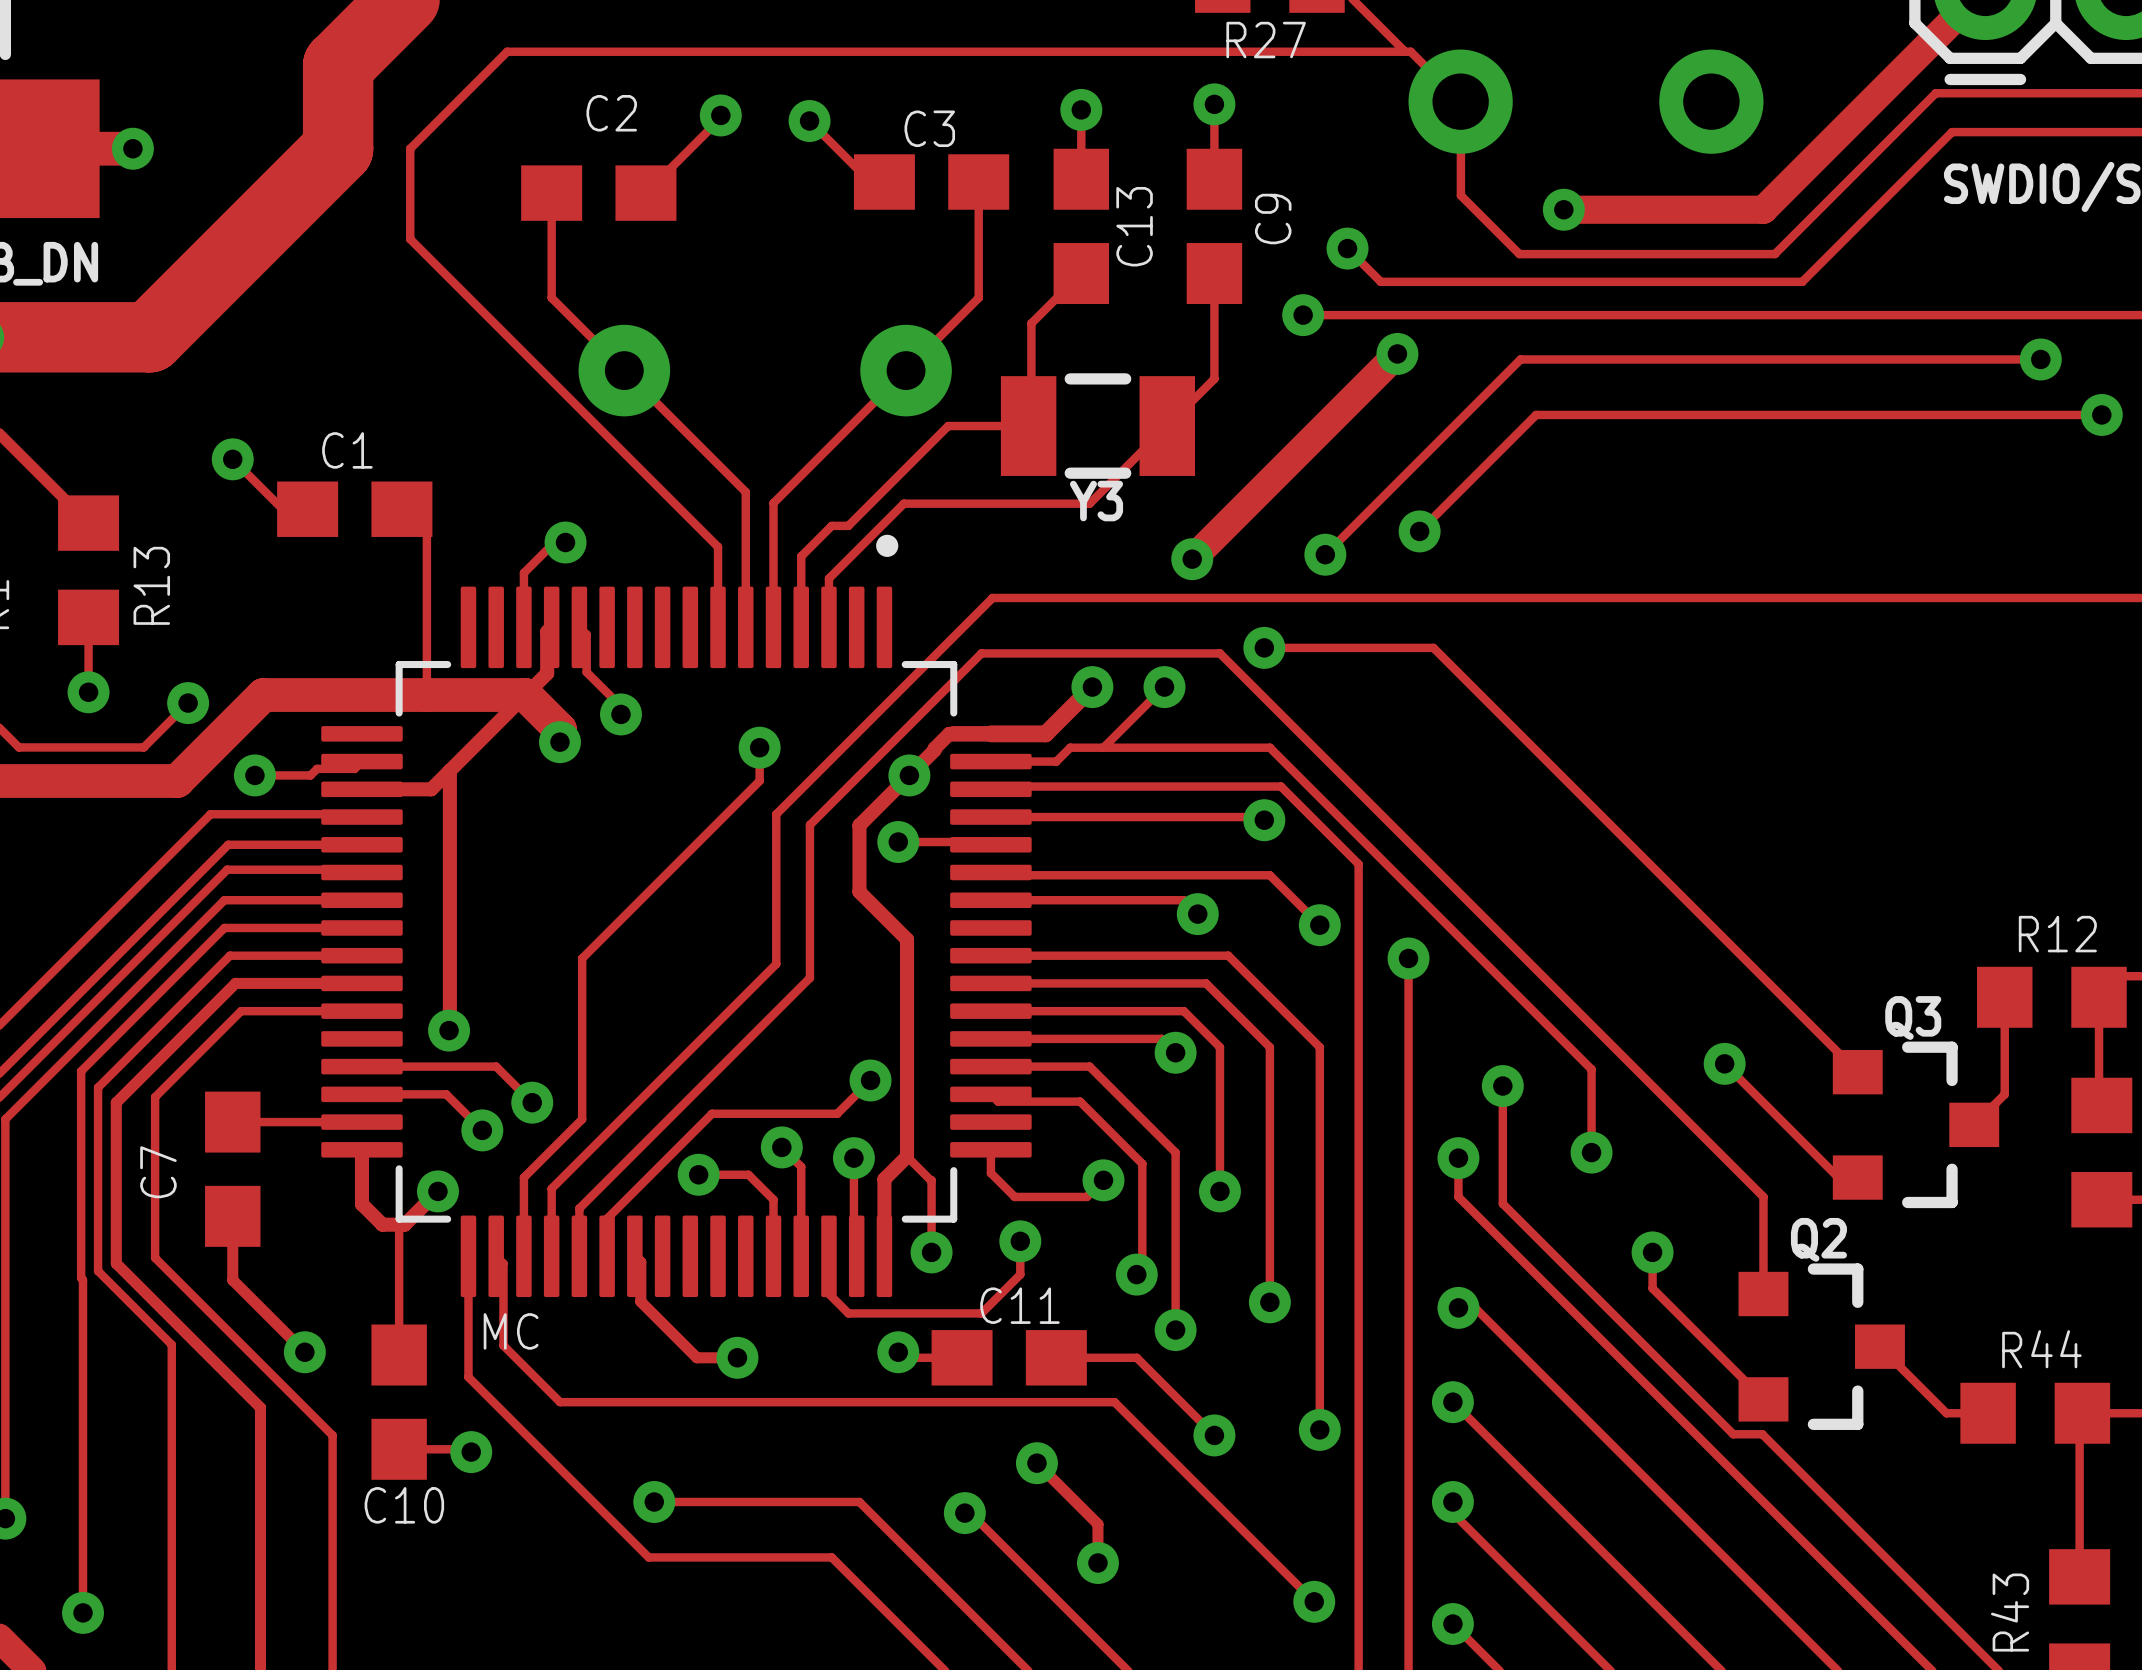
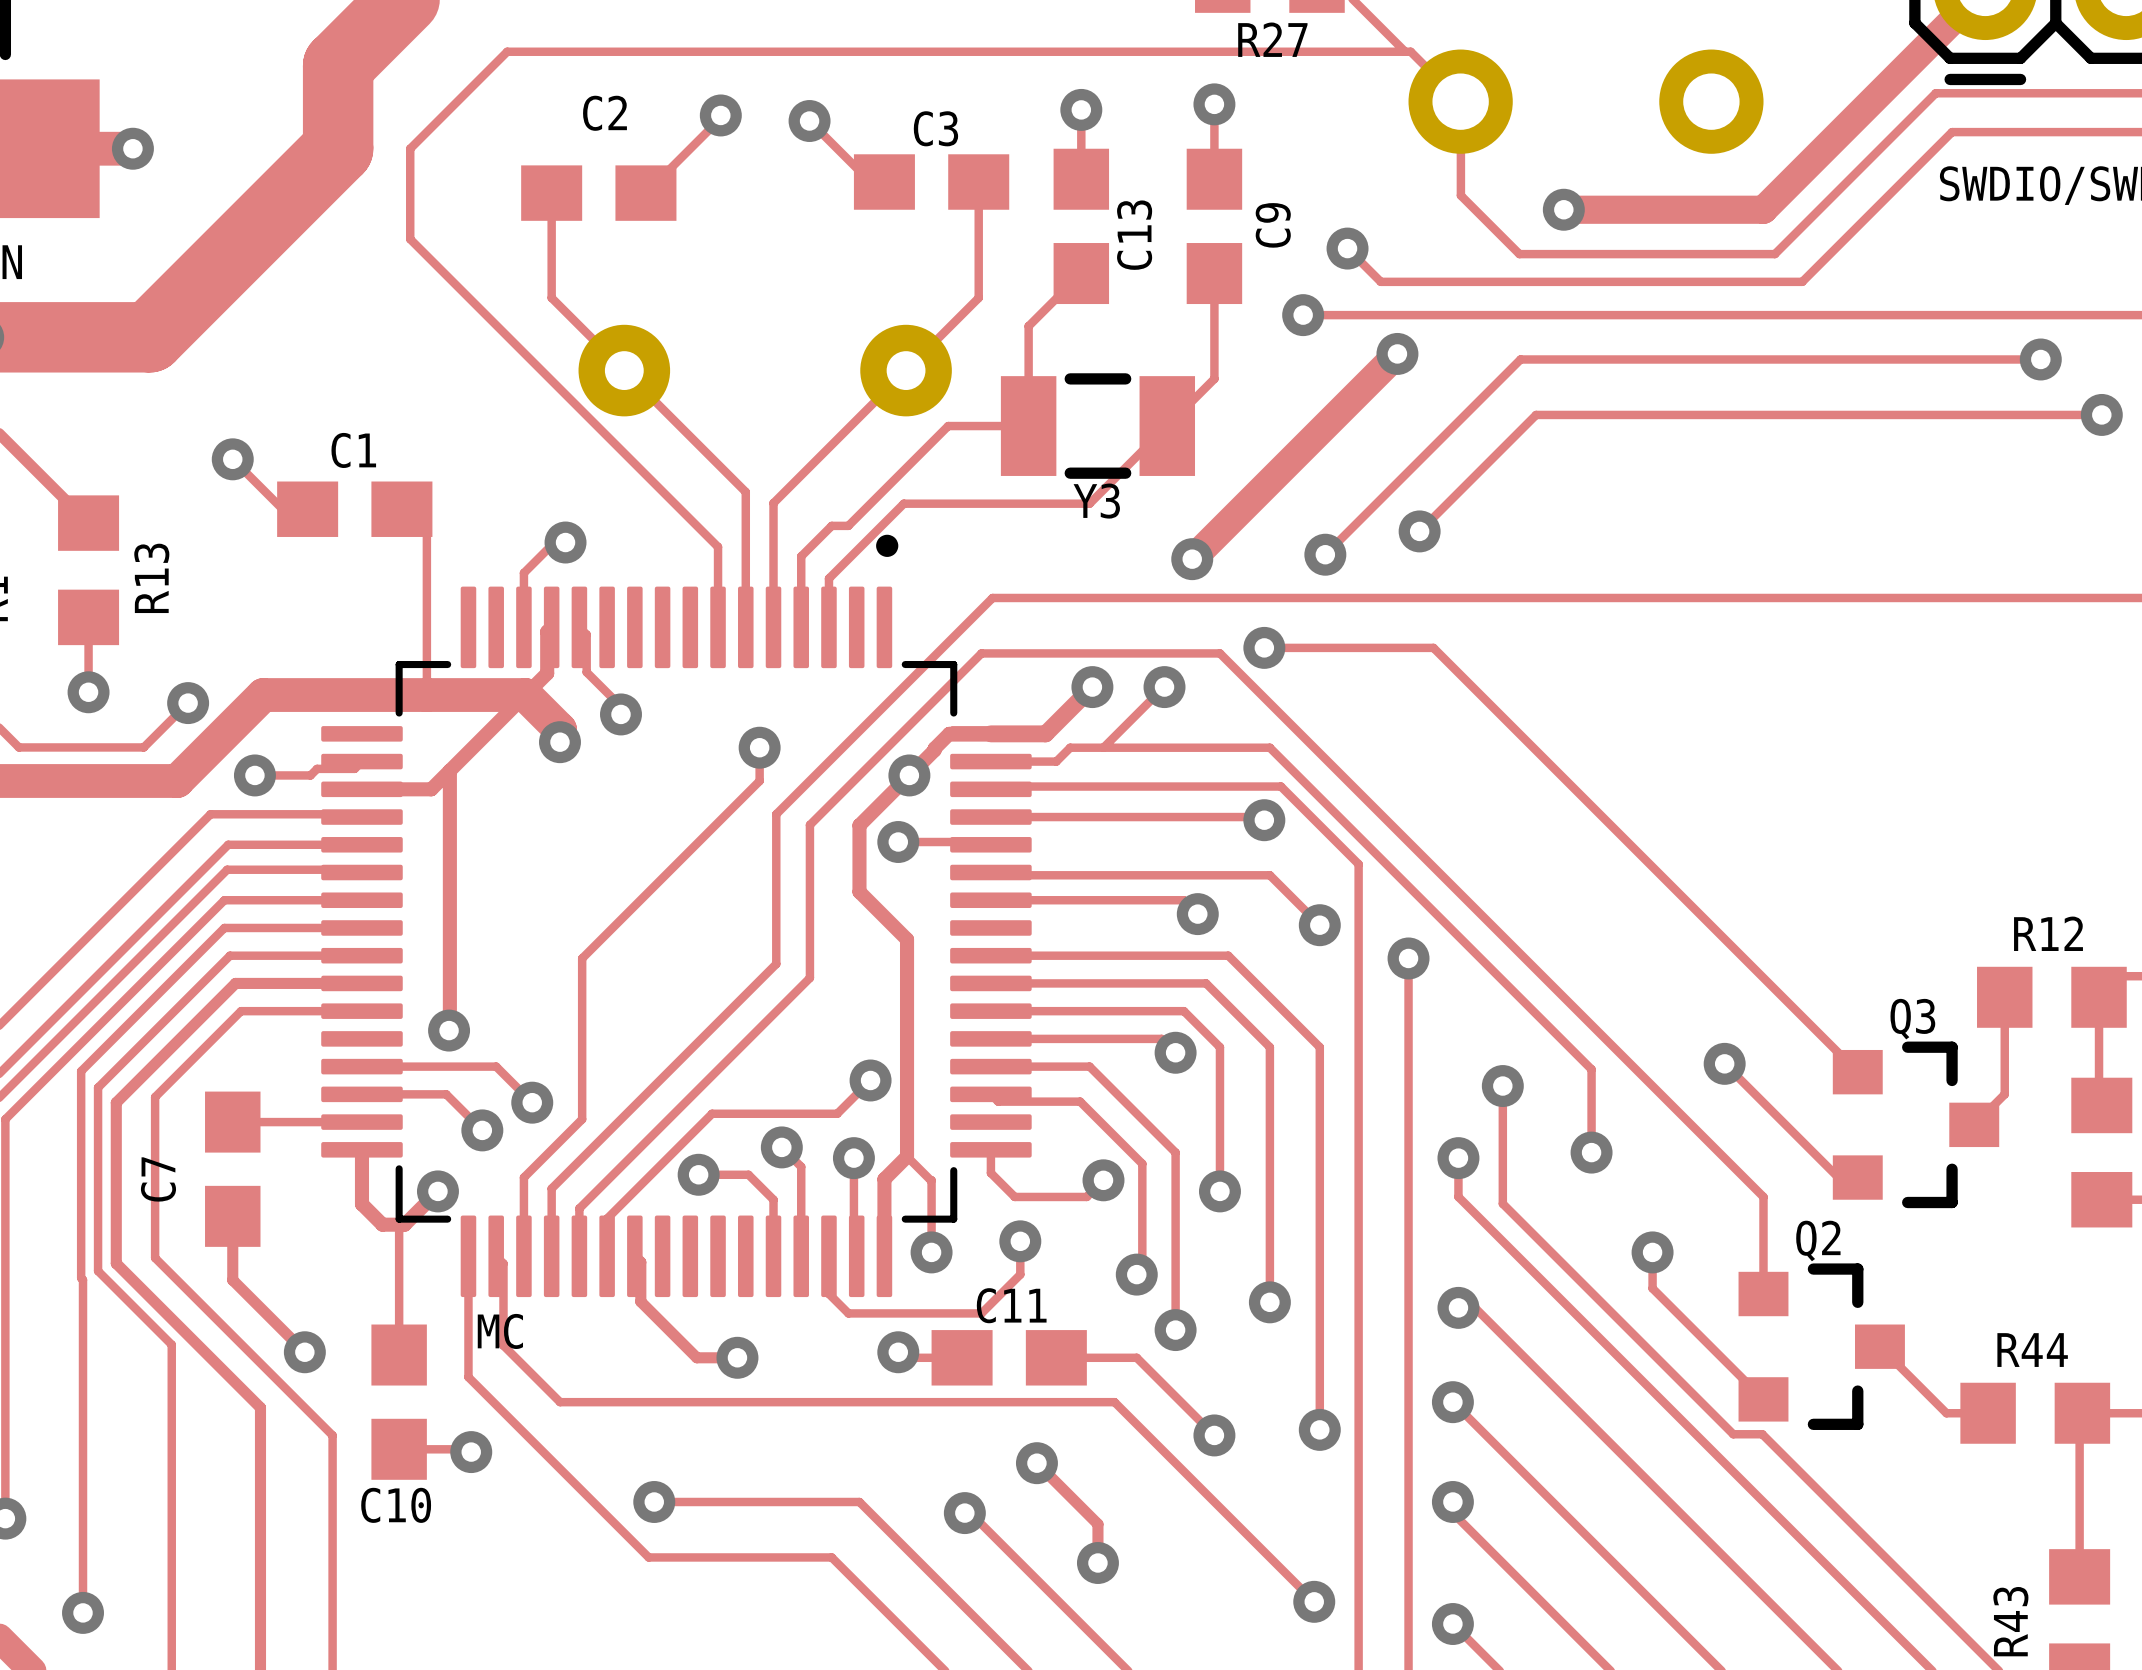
track: (1031, 323) (1031, 423) (1028, 426) -> (1031, 323) (1028, 326) (1028, 426) (1009, 426)

